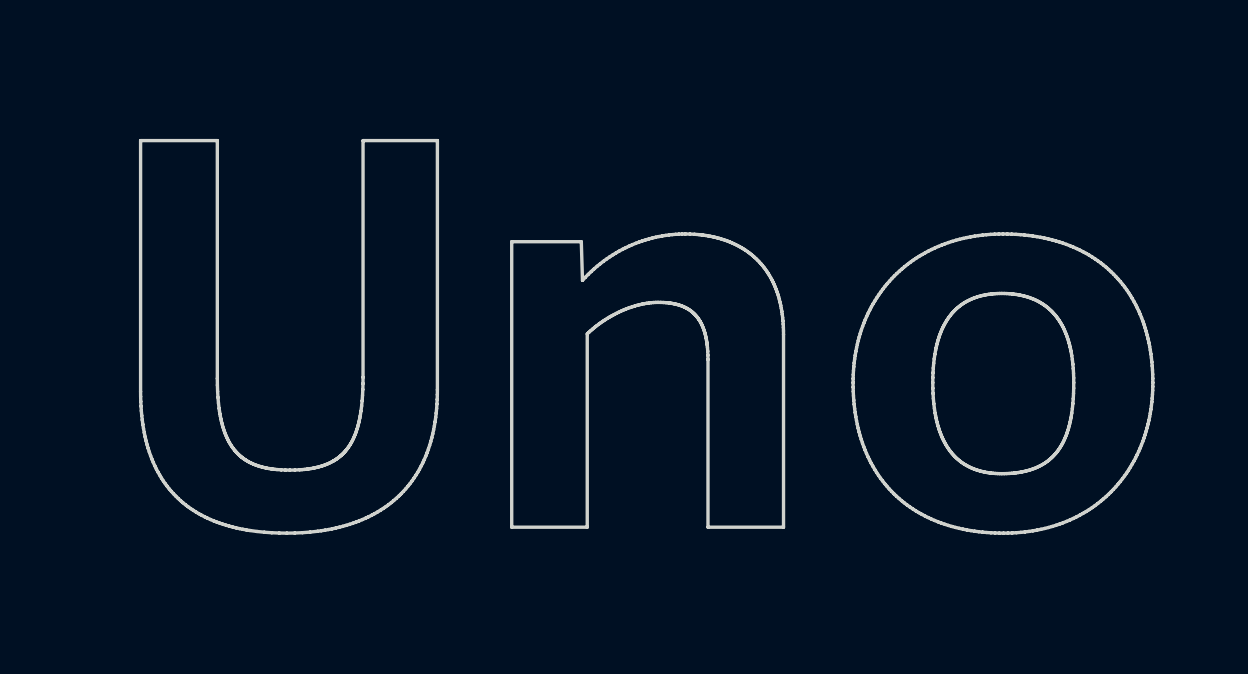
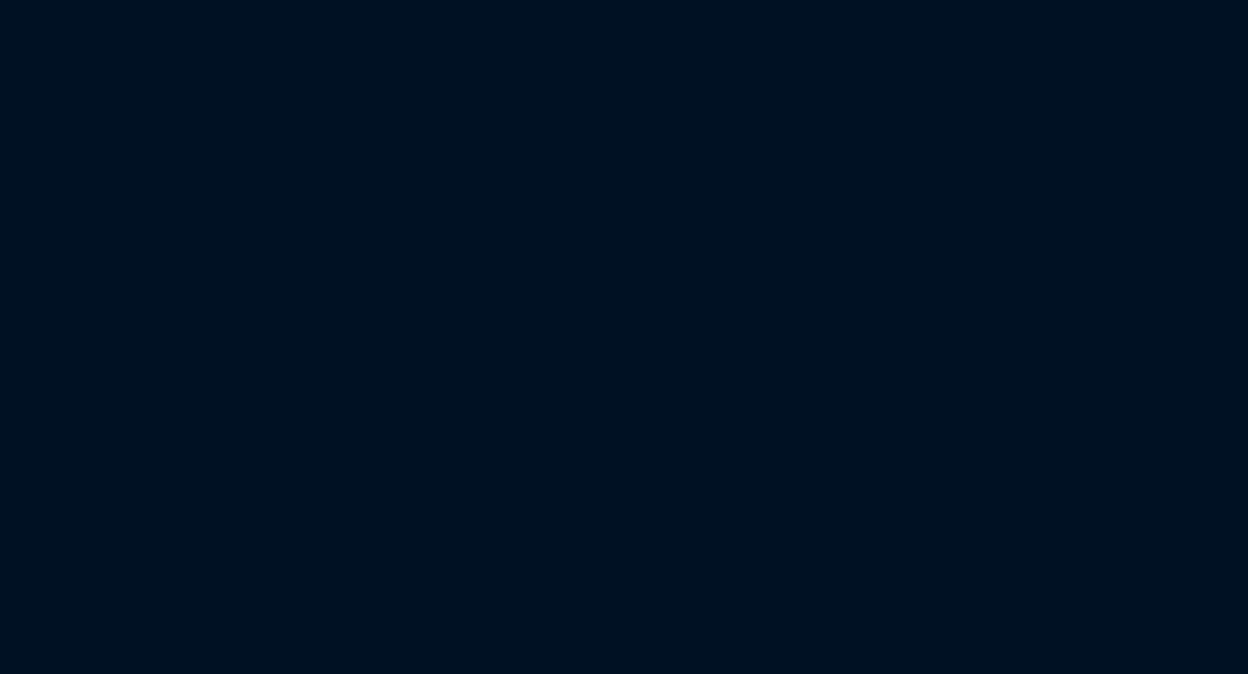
board edge: (140, 140) (217, 140) (217, 385) (220, 418) (229, 442) (242, 458) (263, 467) (289, 470) (316, 467) (337, 458) (350, 443) (359, 420) (362, 383) (363, 140) (437, 140) (437, 389) (435, 421) (428, 449) (417, 472) (403, 491) (383, 508) (359, 520) (328, 529) (294, 533) (257, 531) (226, 525) (201, 515) (180, 500) (163, 480) (148, 448) (141, 406) (140, 140) -> none
board edge: (678, 234) (712, 236) (741, 247) (762, 265) (776, 291) (781, 311) (783, 330) (783, 527) (707, 527) (707, 359) (705, 336) (699, 321) (690, 310) (676, 304) (658, 302) (639, 304) (620, 311) (602, 321) (587, 333) (587, 527) (511, 527) (511, 241) (581, 241) (582, 280) (603, 261) (625, 247) (652, 238) (678, 234) -> none
board edge: (994, 234) (1024, 235) (1055, 240) (1083, 251) (1106, 267) (1124, 287) (1138, 311) (1148, 338) (1152, 366) (1152, 398) (1147, 427) (1135, 457) (1120, 481) (1100, 501) (1076, 516) (1048, 527) (1020, 532) (986, 532) (955, 527) (928, 517) (904, 502) (884, 483) (869, 460) (859, 432) (853, 400) (853, 366) (859, 336) (869, 309) (887, 283) (910, 262) (934, 247) (963, 238) (994, 234) -> none
board edge: (997, 293) (980, 295) (966, 301) (955, 309) (946, 320) (939, 336) (934, 354) (933, 398) (940, 433) (955, 457) (966, 465) (979, 470) (1011, 473) (1026, 470) (1040, 465) (1052, 457) (1061, 445) (1067, 432) (1071, 413) (1073, 368) (1065, 333) (1051, 310) (1040, 302) (1028, 297) (997, 293) -> none

